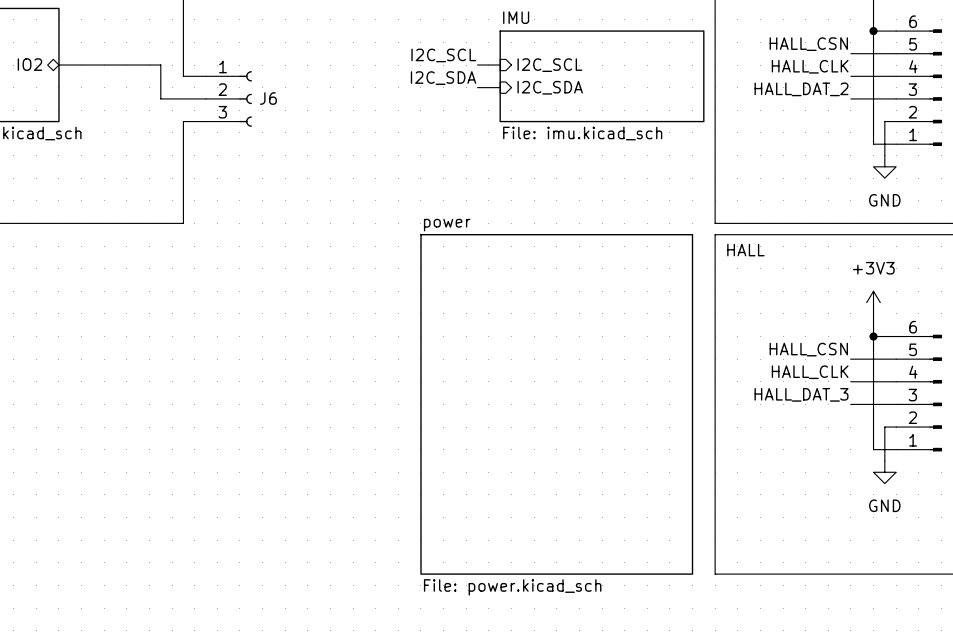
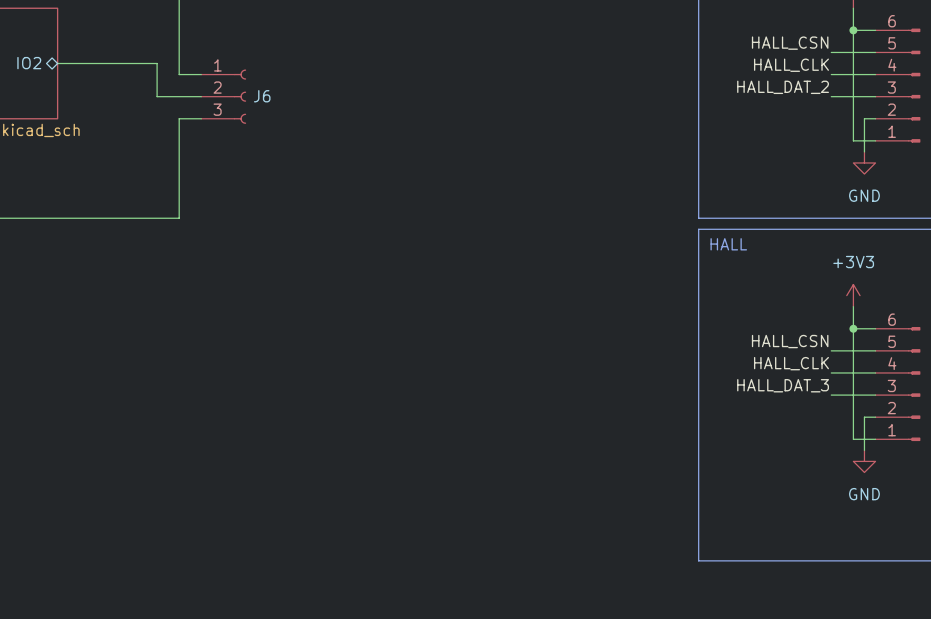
label: I2C_SCL (443, 55) -> none
wire: (477, 65) (500, 65) -> none
sheet pin: I2C_SCL (549, 65) -> none
sheet IMU: File: imu.kicad_sch (602, 76) -> none
label: I2C_SDA (443, 78) -> none
wire: (477, 87) (500, 87) -> none
sheet pin: I2C_SDA (550, 87) -> none
sheet power: File: power.kicad_sch (556, 404) -> none

